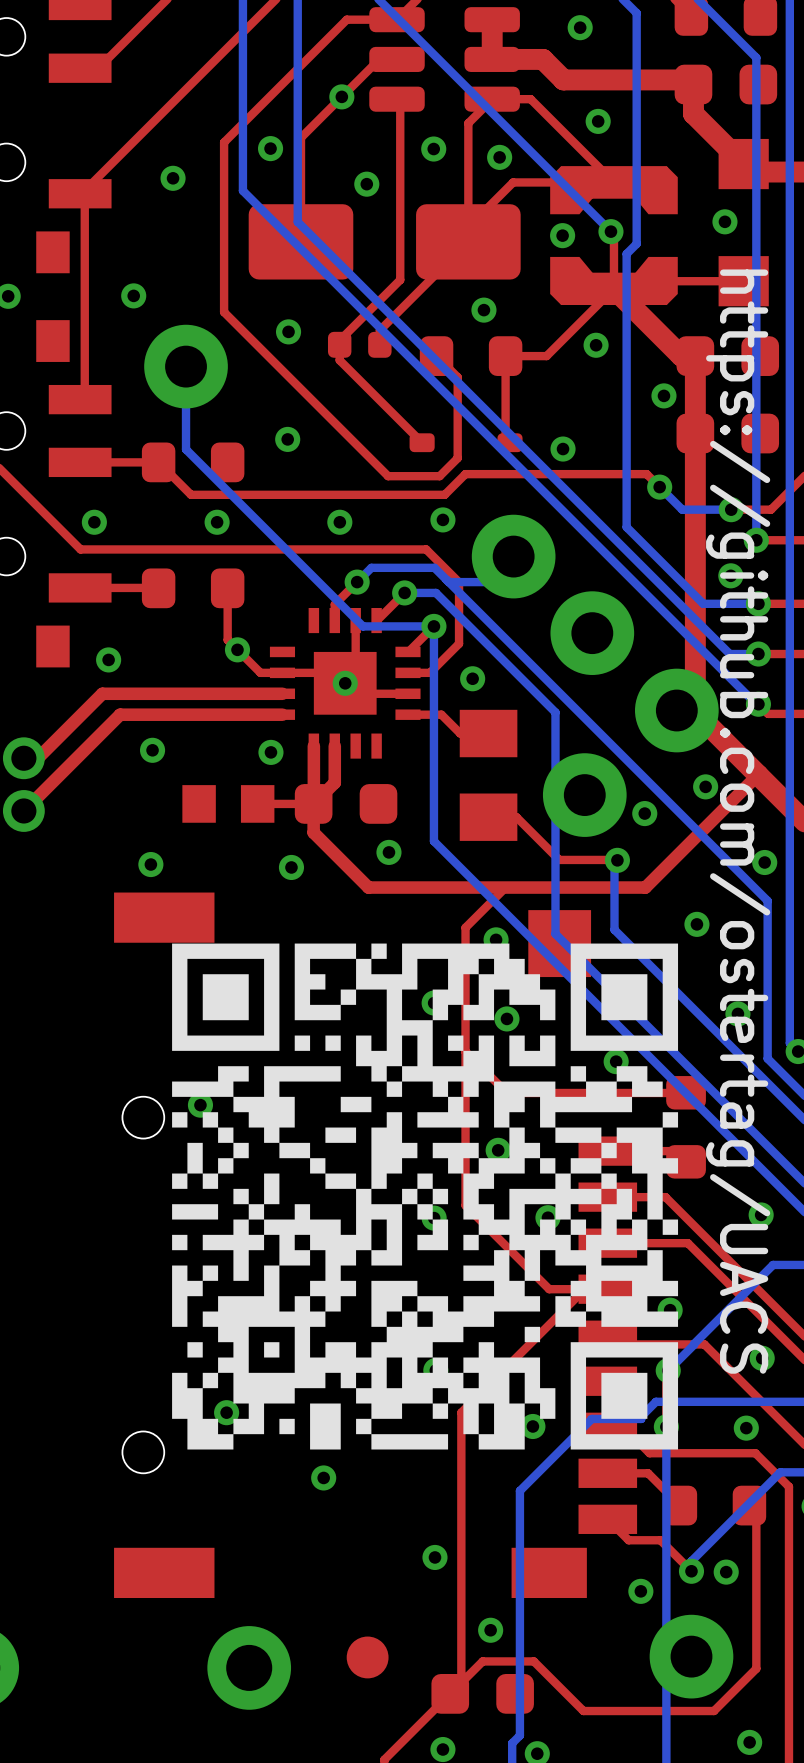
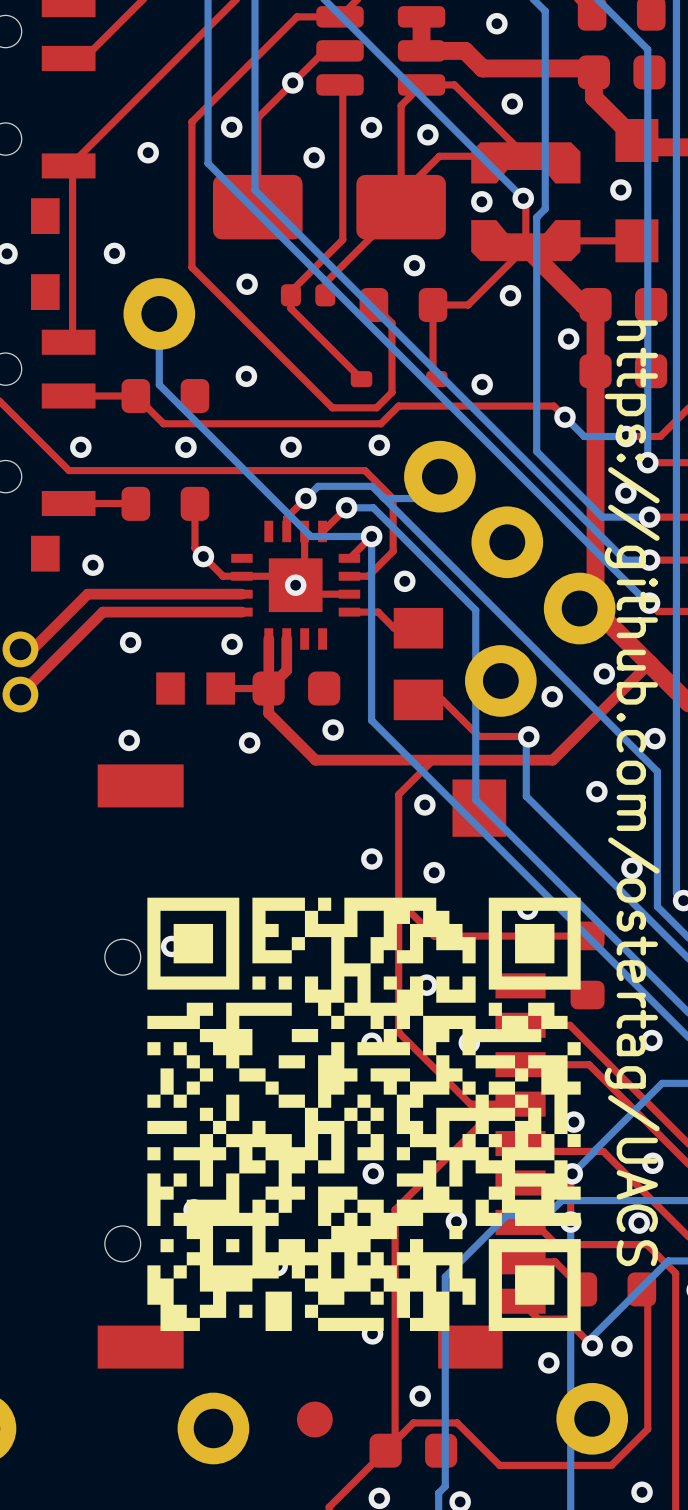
text position: https://github.com/ostertag/UACS (738, 821) -> https://github.com/ostertag/UACS (632, 793)
drawing position: (425, 1196) -> (364, 1114)

